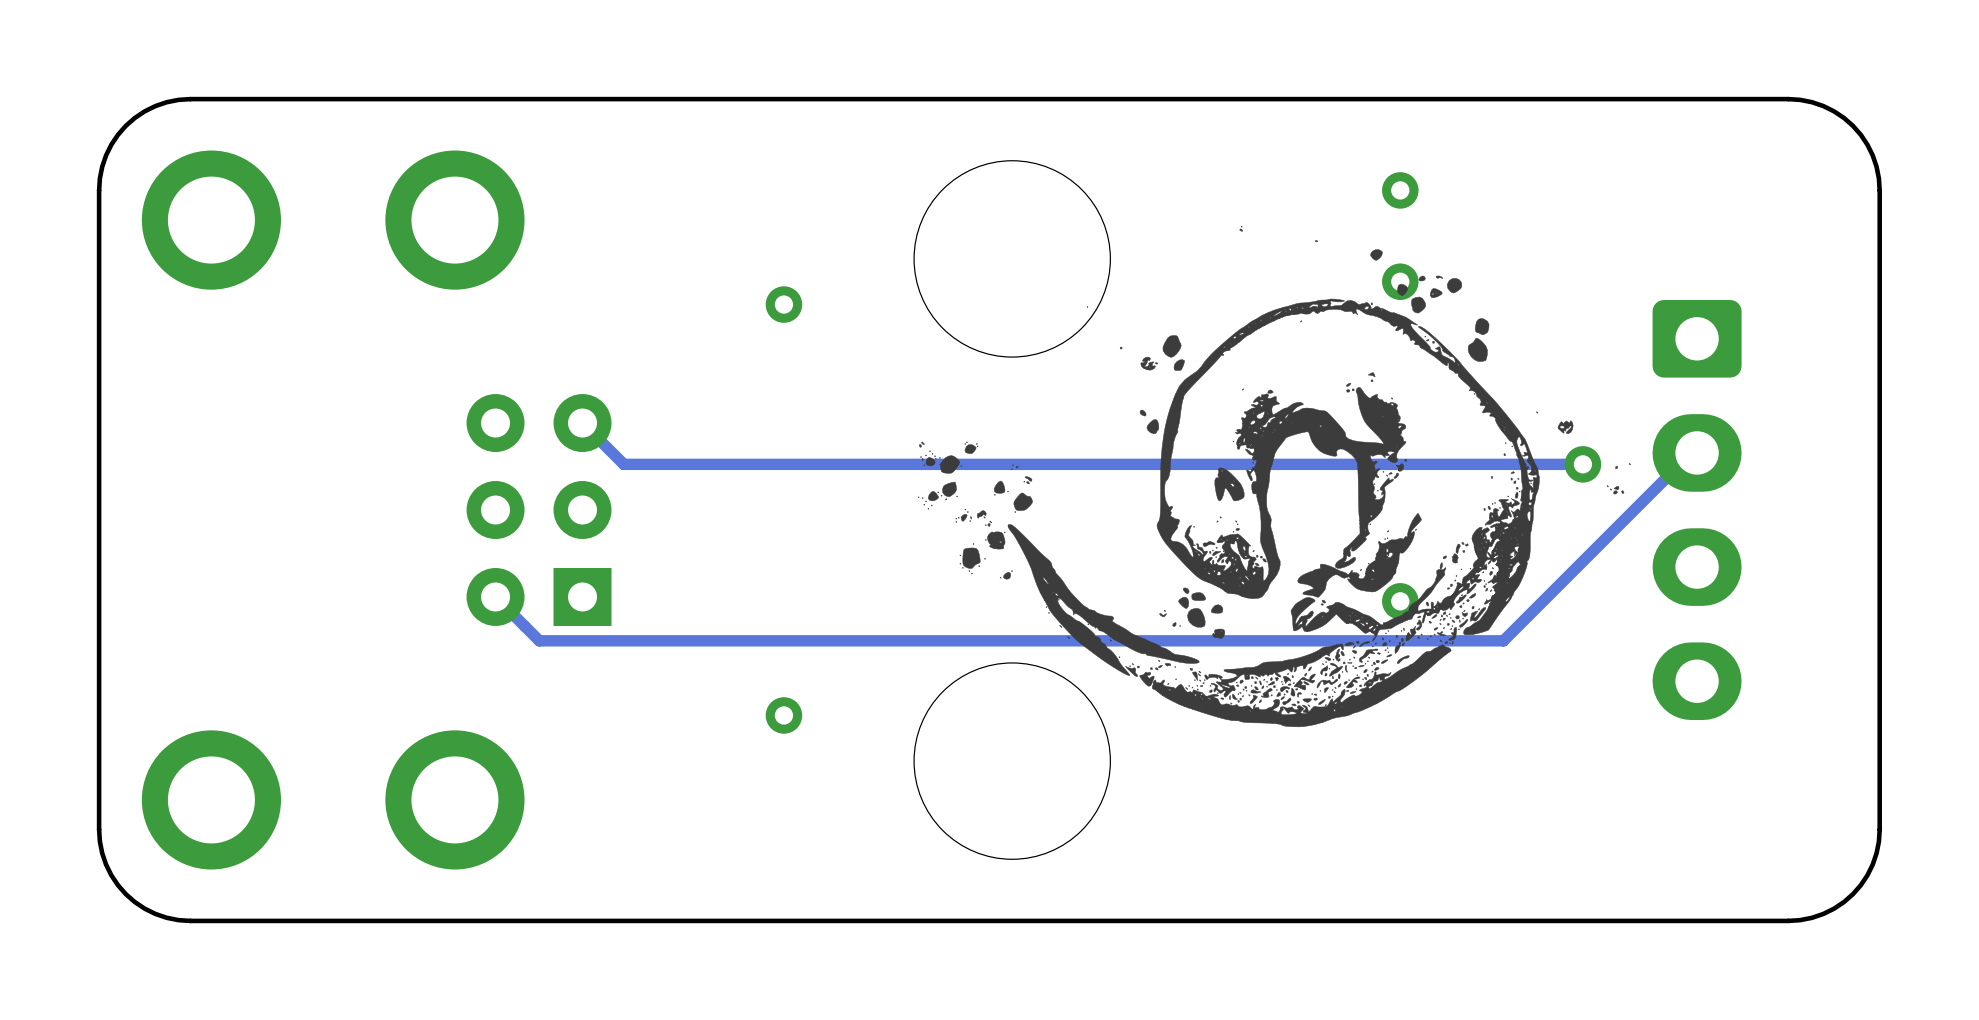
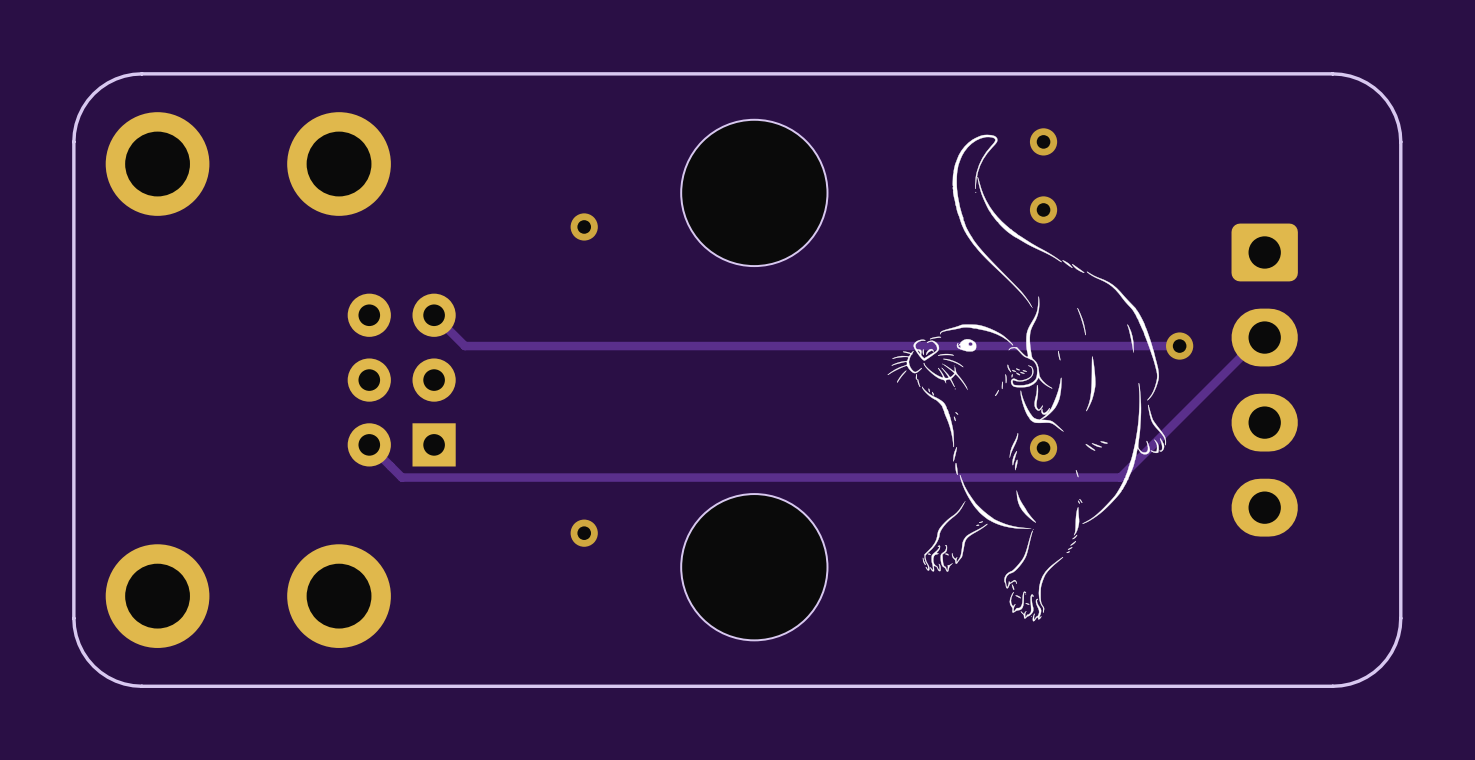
drawing: none -> [887, 134, 1167, 622]
drawing: [917, 226, 1631, 728] -> none

